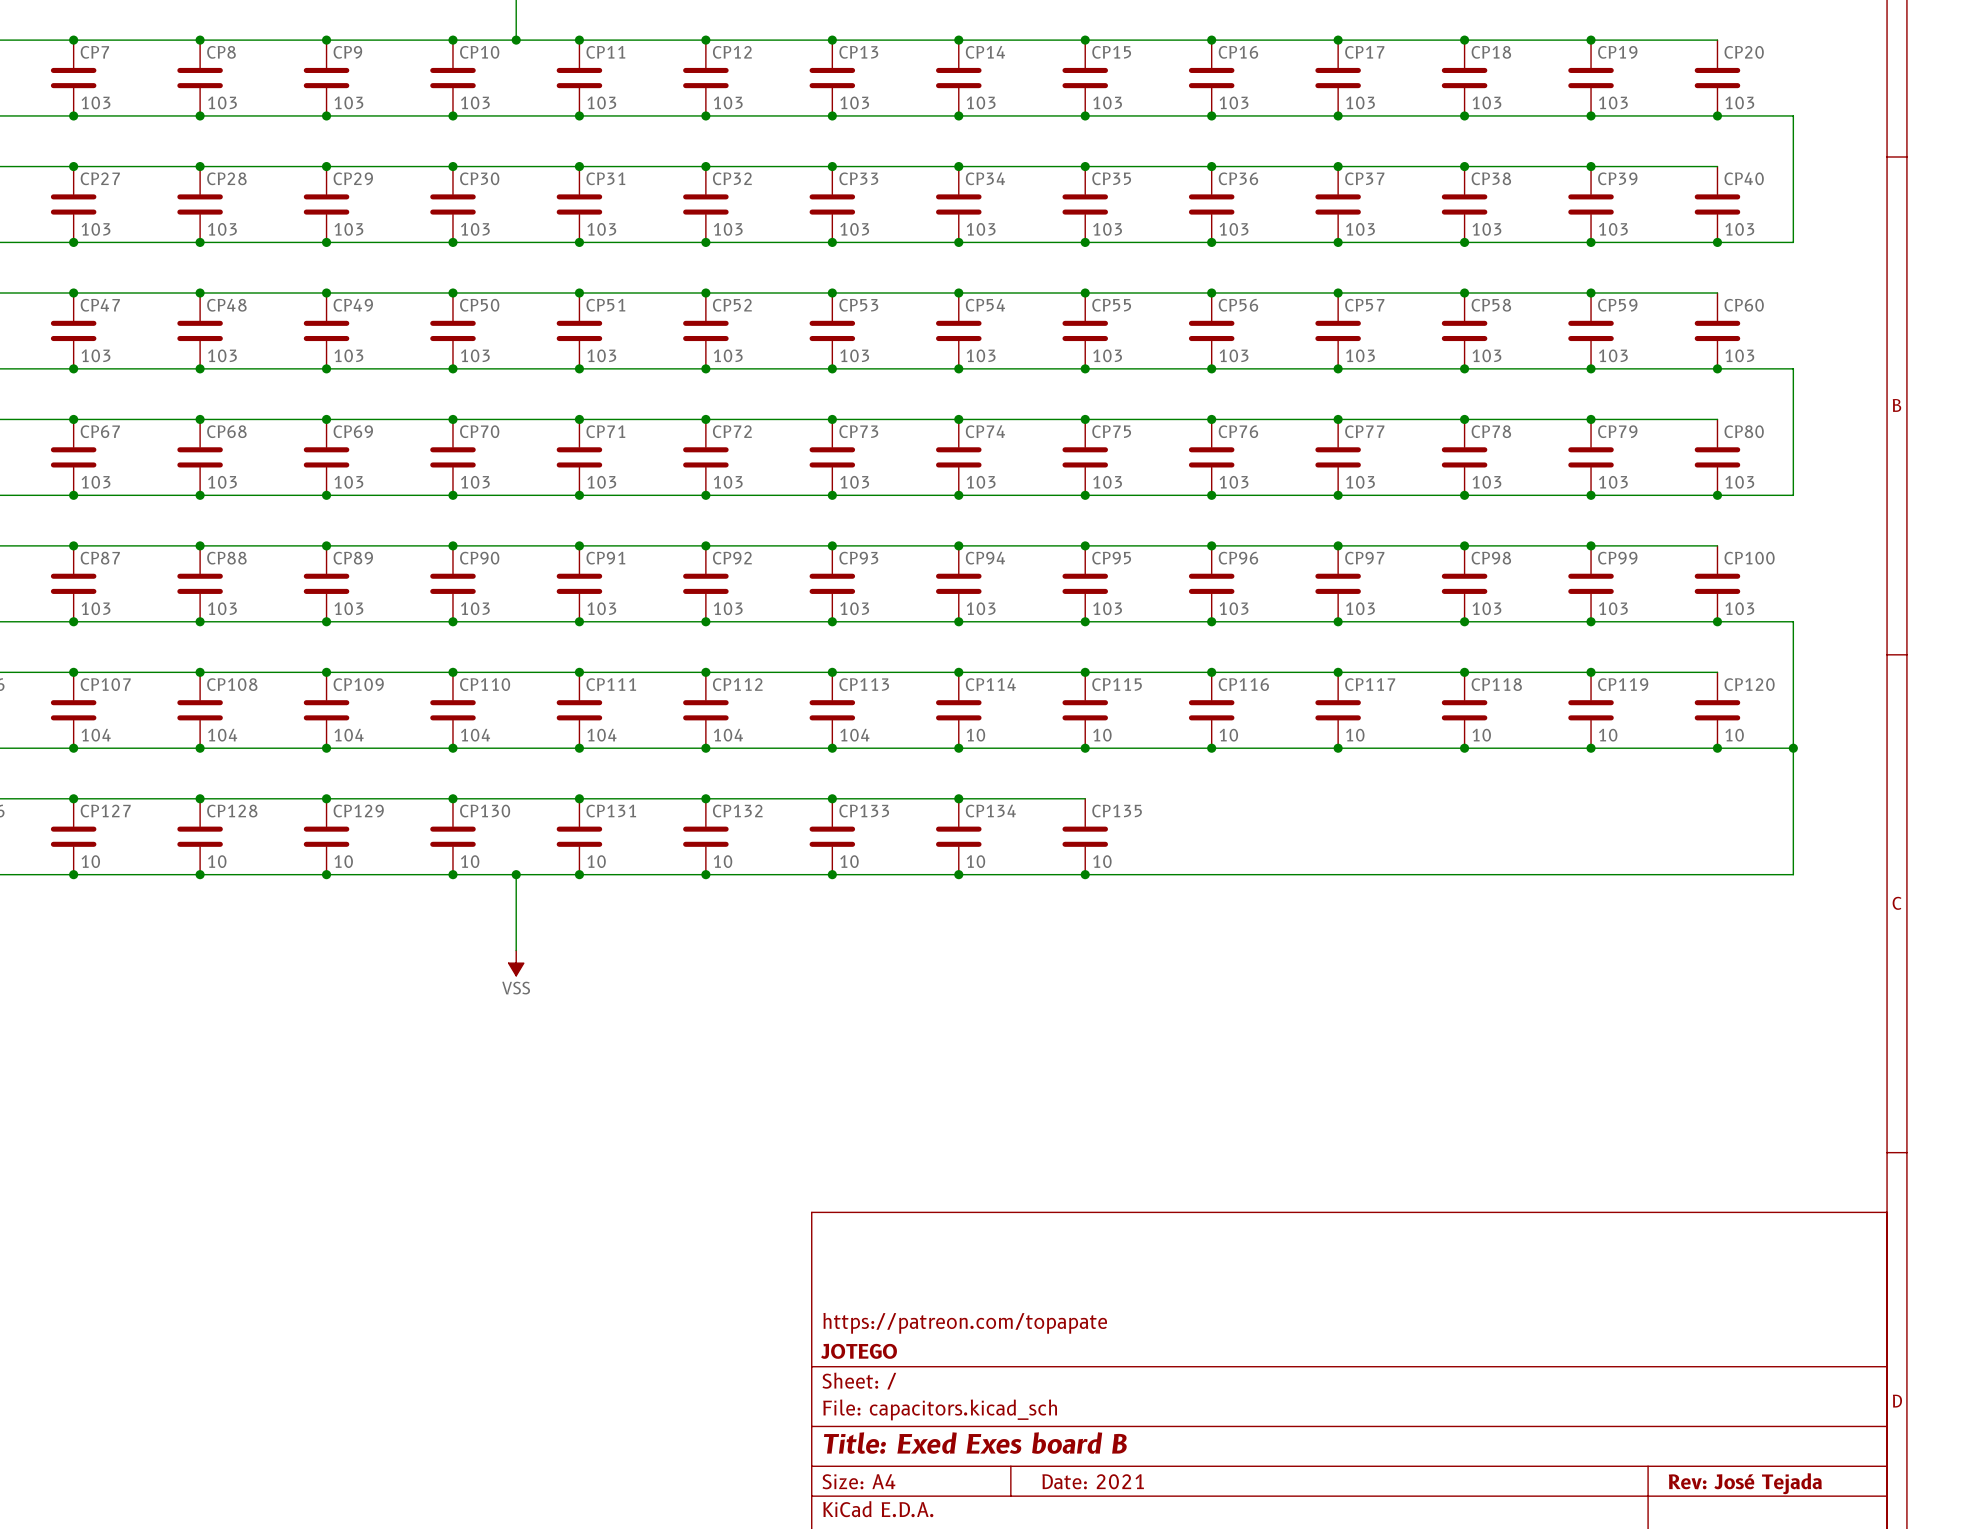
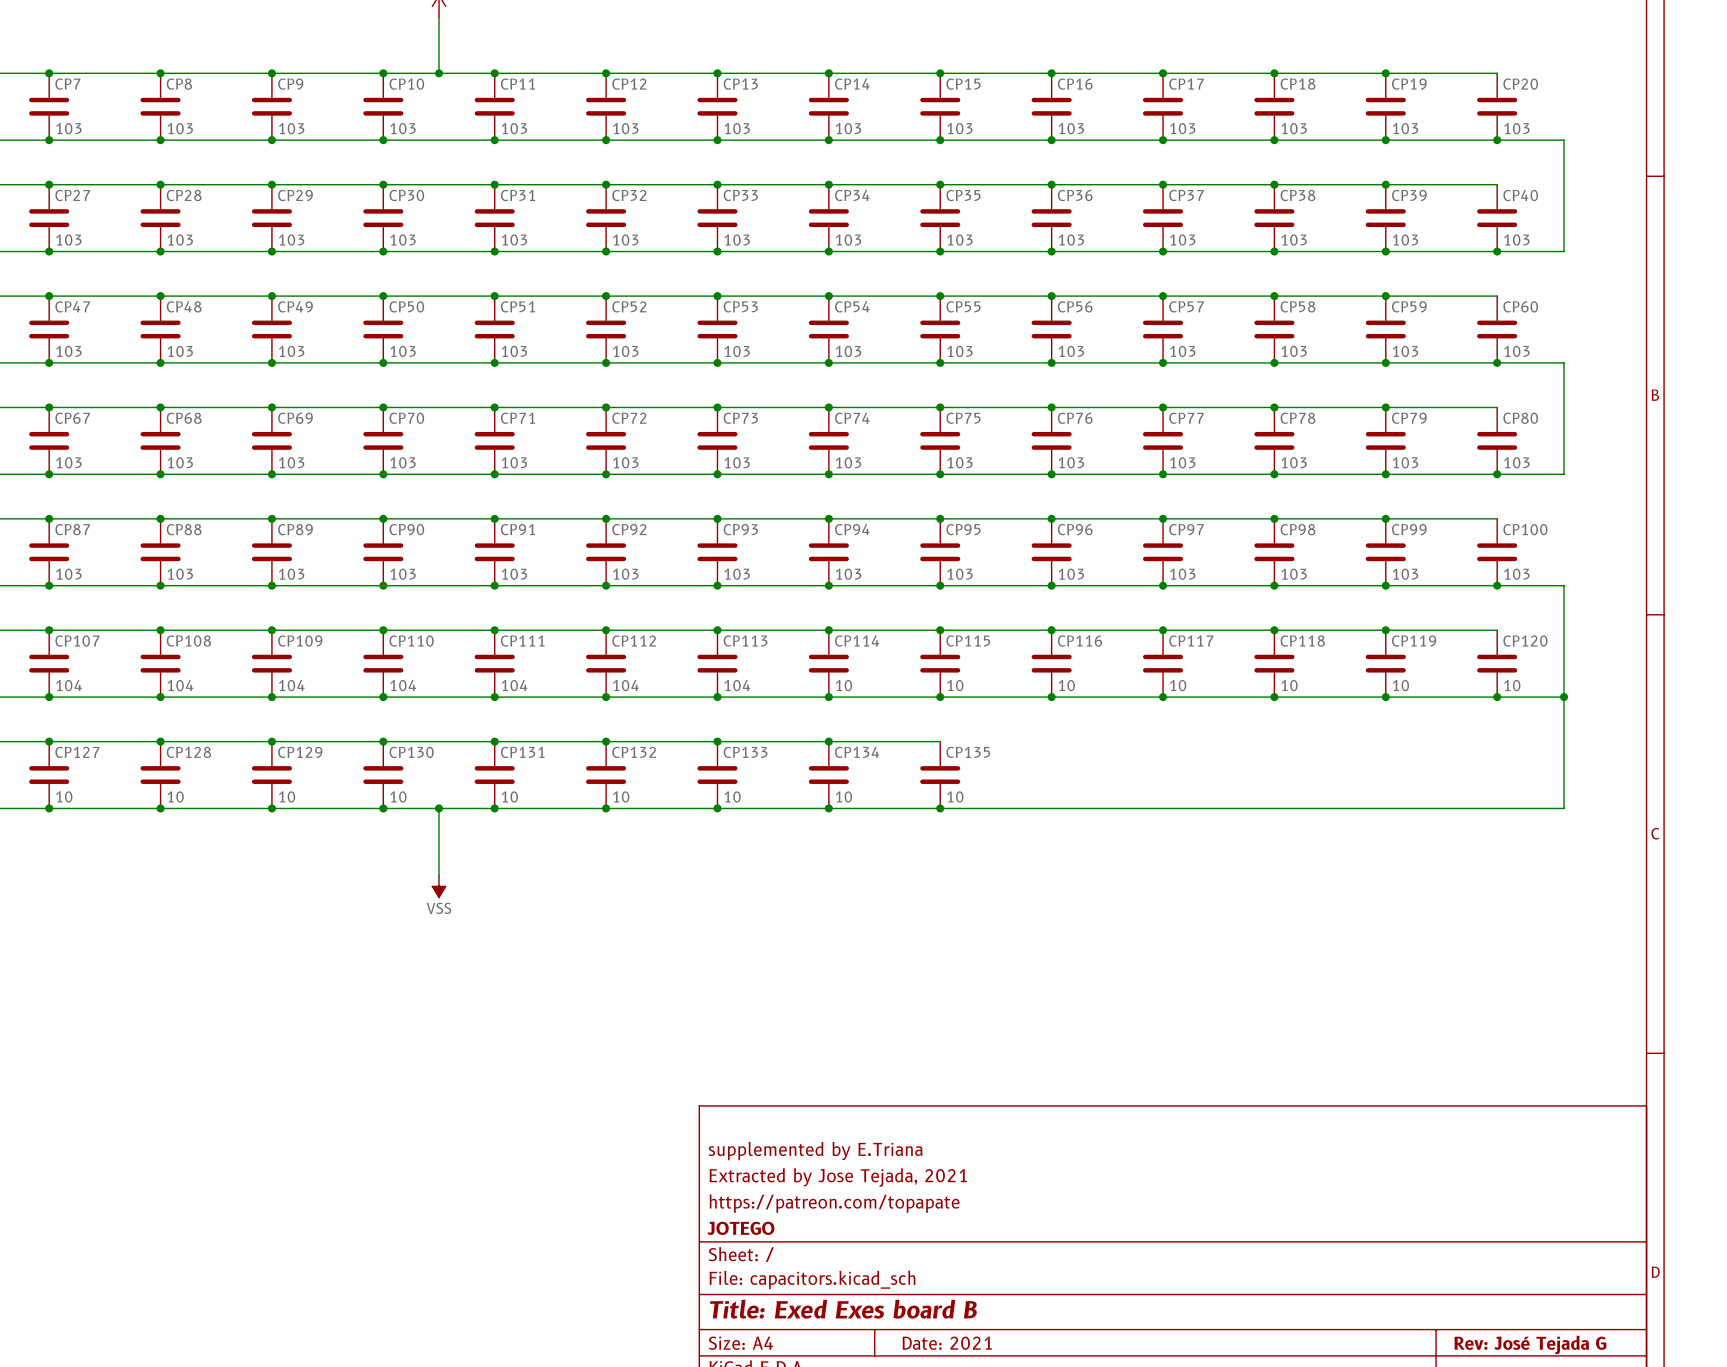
title block: none -> supplemented by E.Triana (815, 1151)
title block: none -> Extracted by Jose Tejada, 2021 (838, 1177)
title block: Rev: José Tejada (1745, 1483) -> Rev: José Tejada G (1530, 1344)

